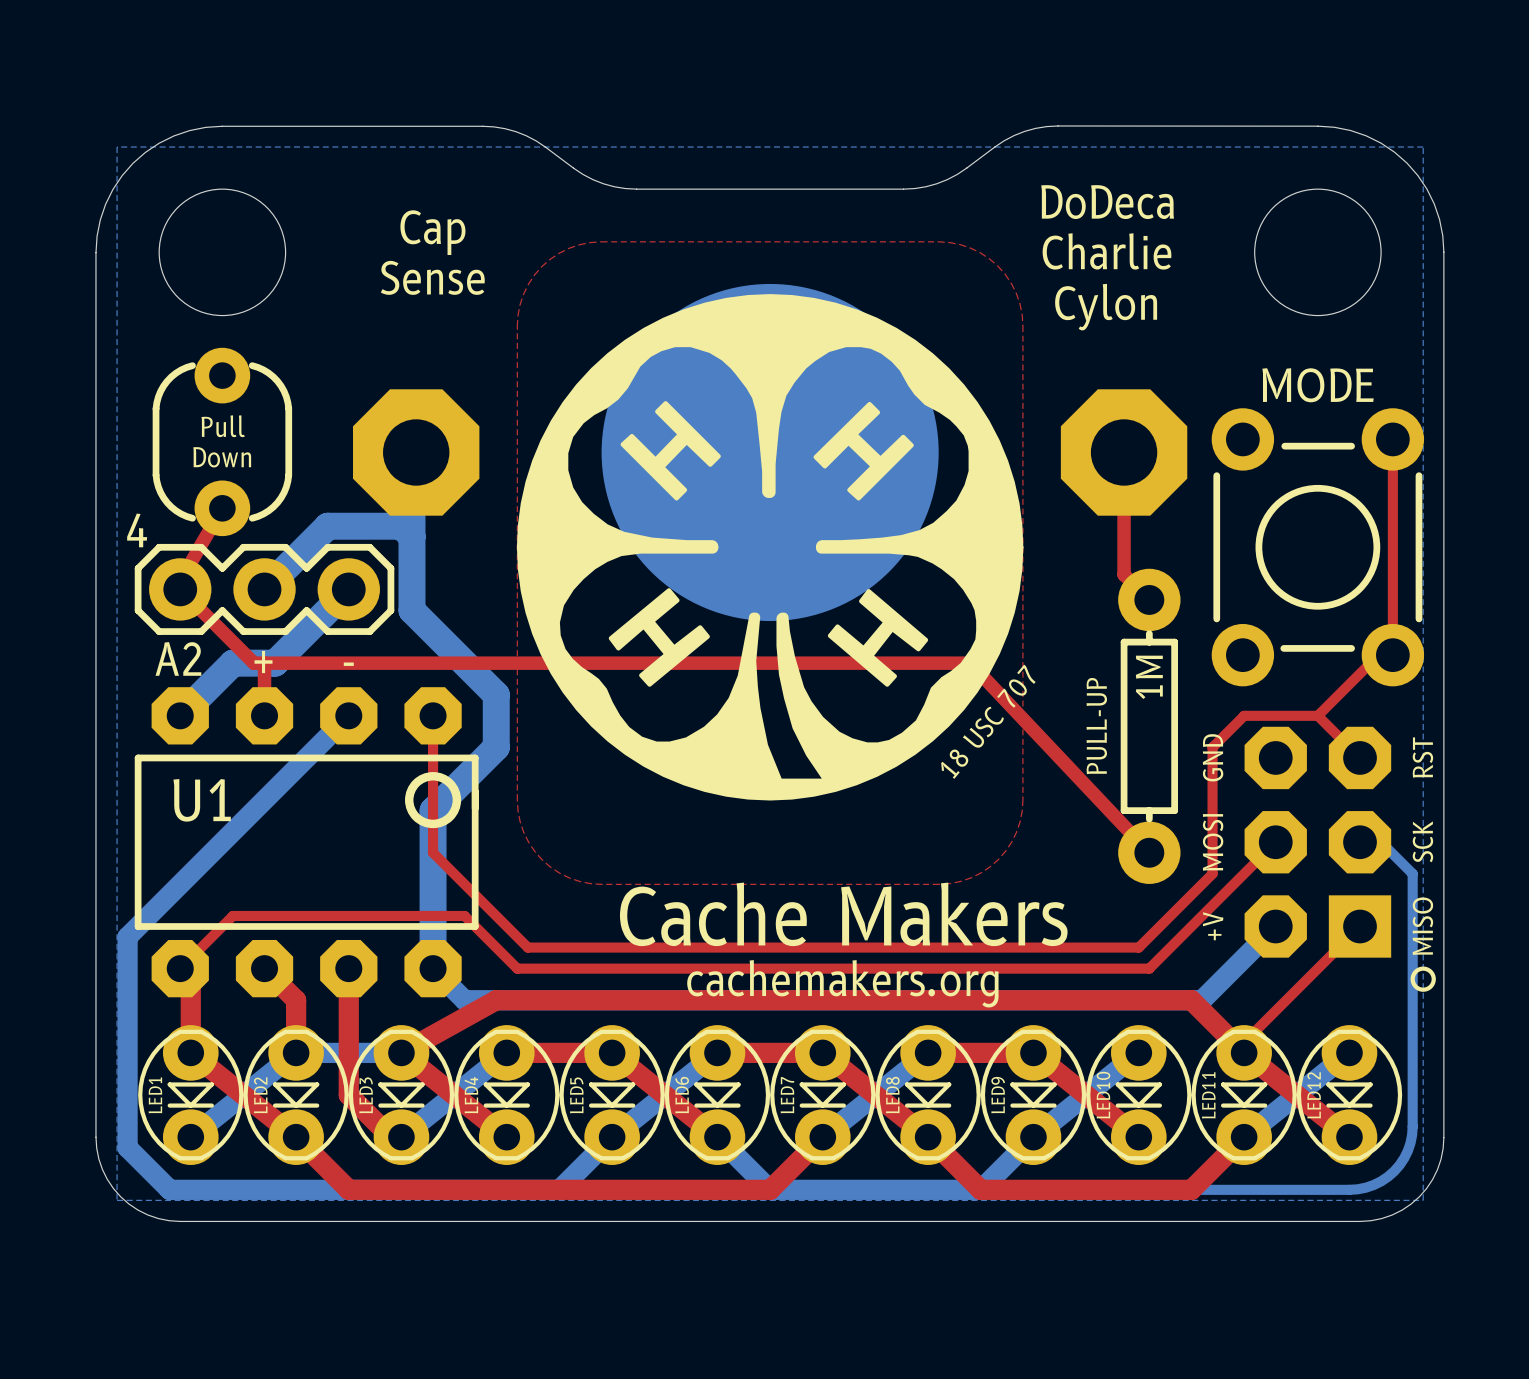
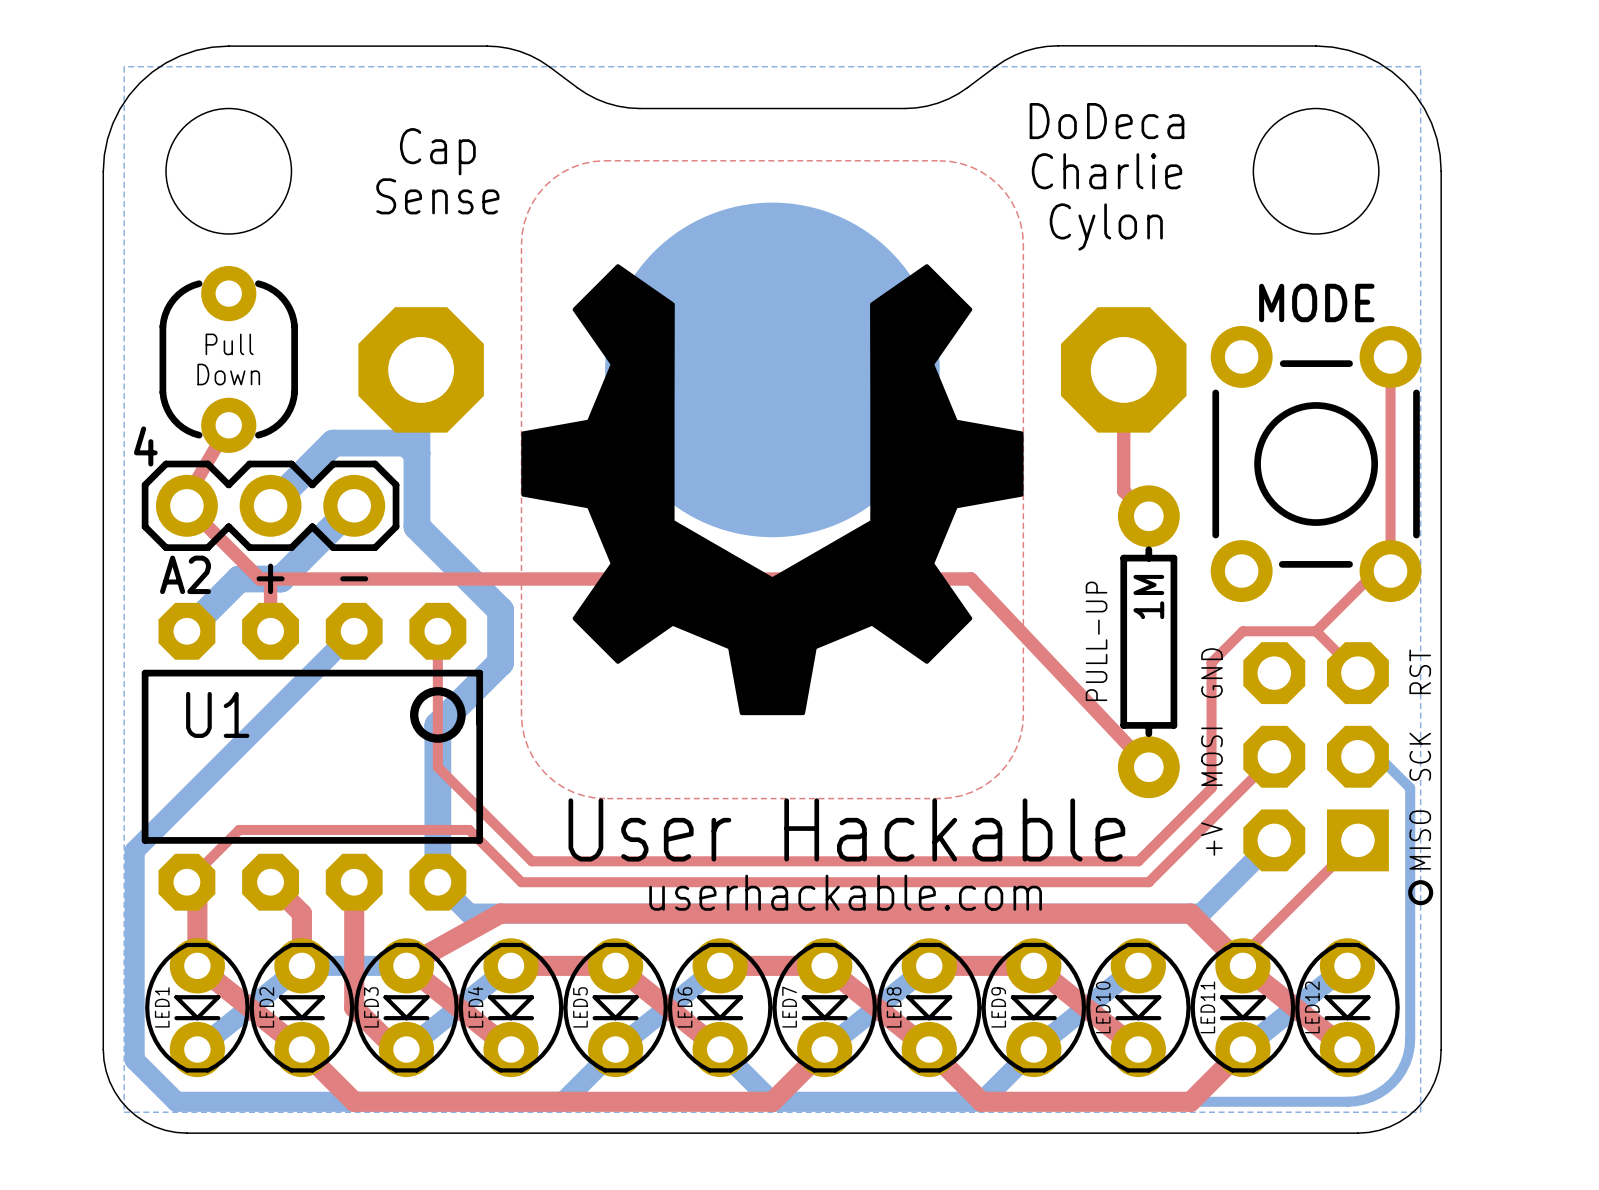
drawing shape: [516, 294, 1036, 801] -> [521, 264, 1024, 716]
text: Cache Makers (843, 914) -> User Hackable (846, 829)
text: cachemakers.org (842, 983) -> userhackable.com (845, 892)

